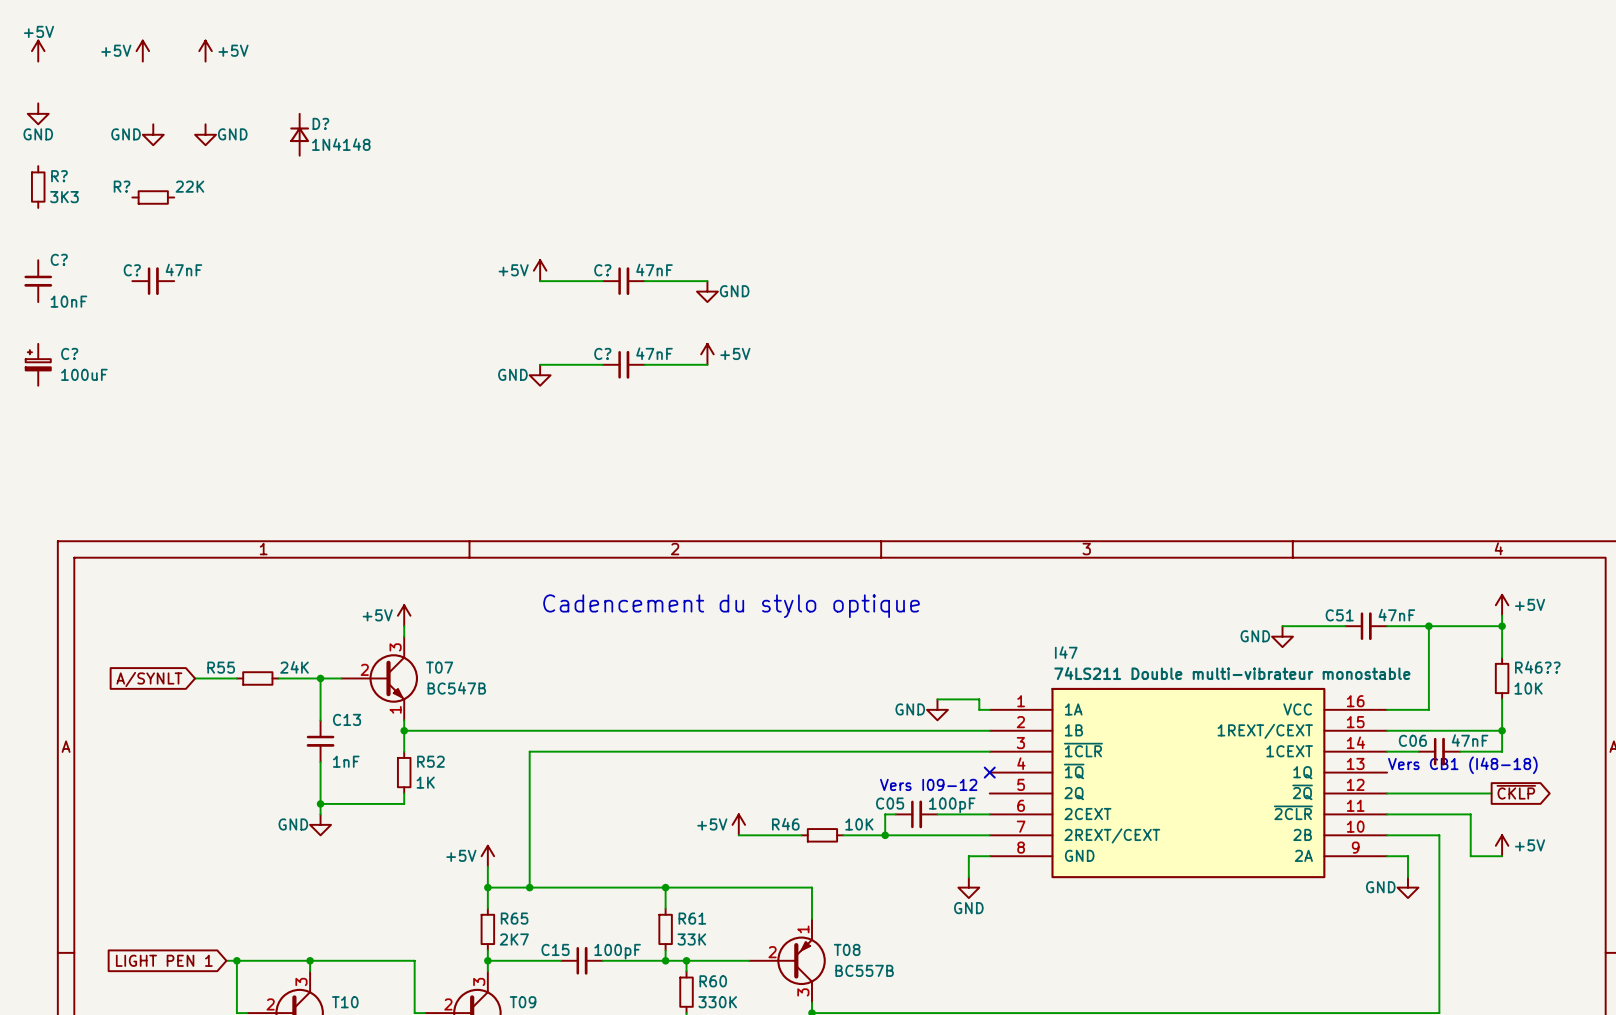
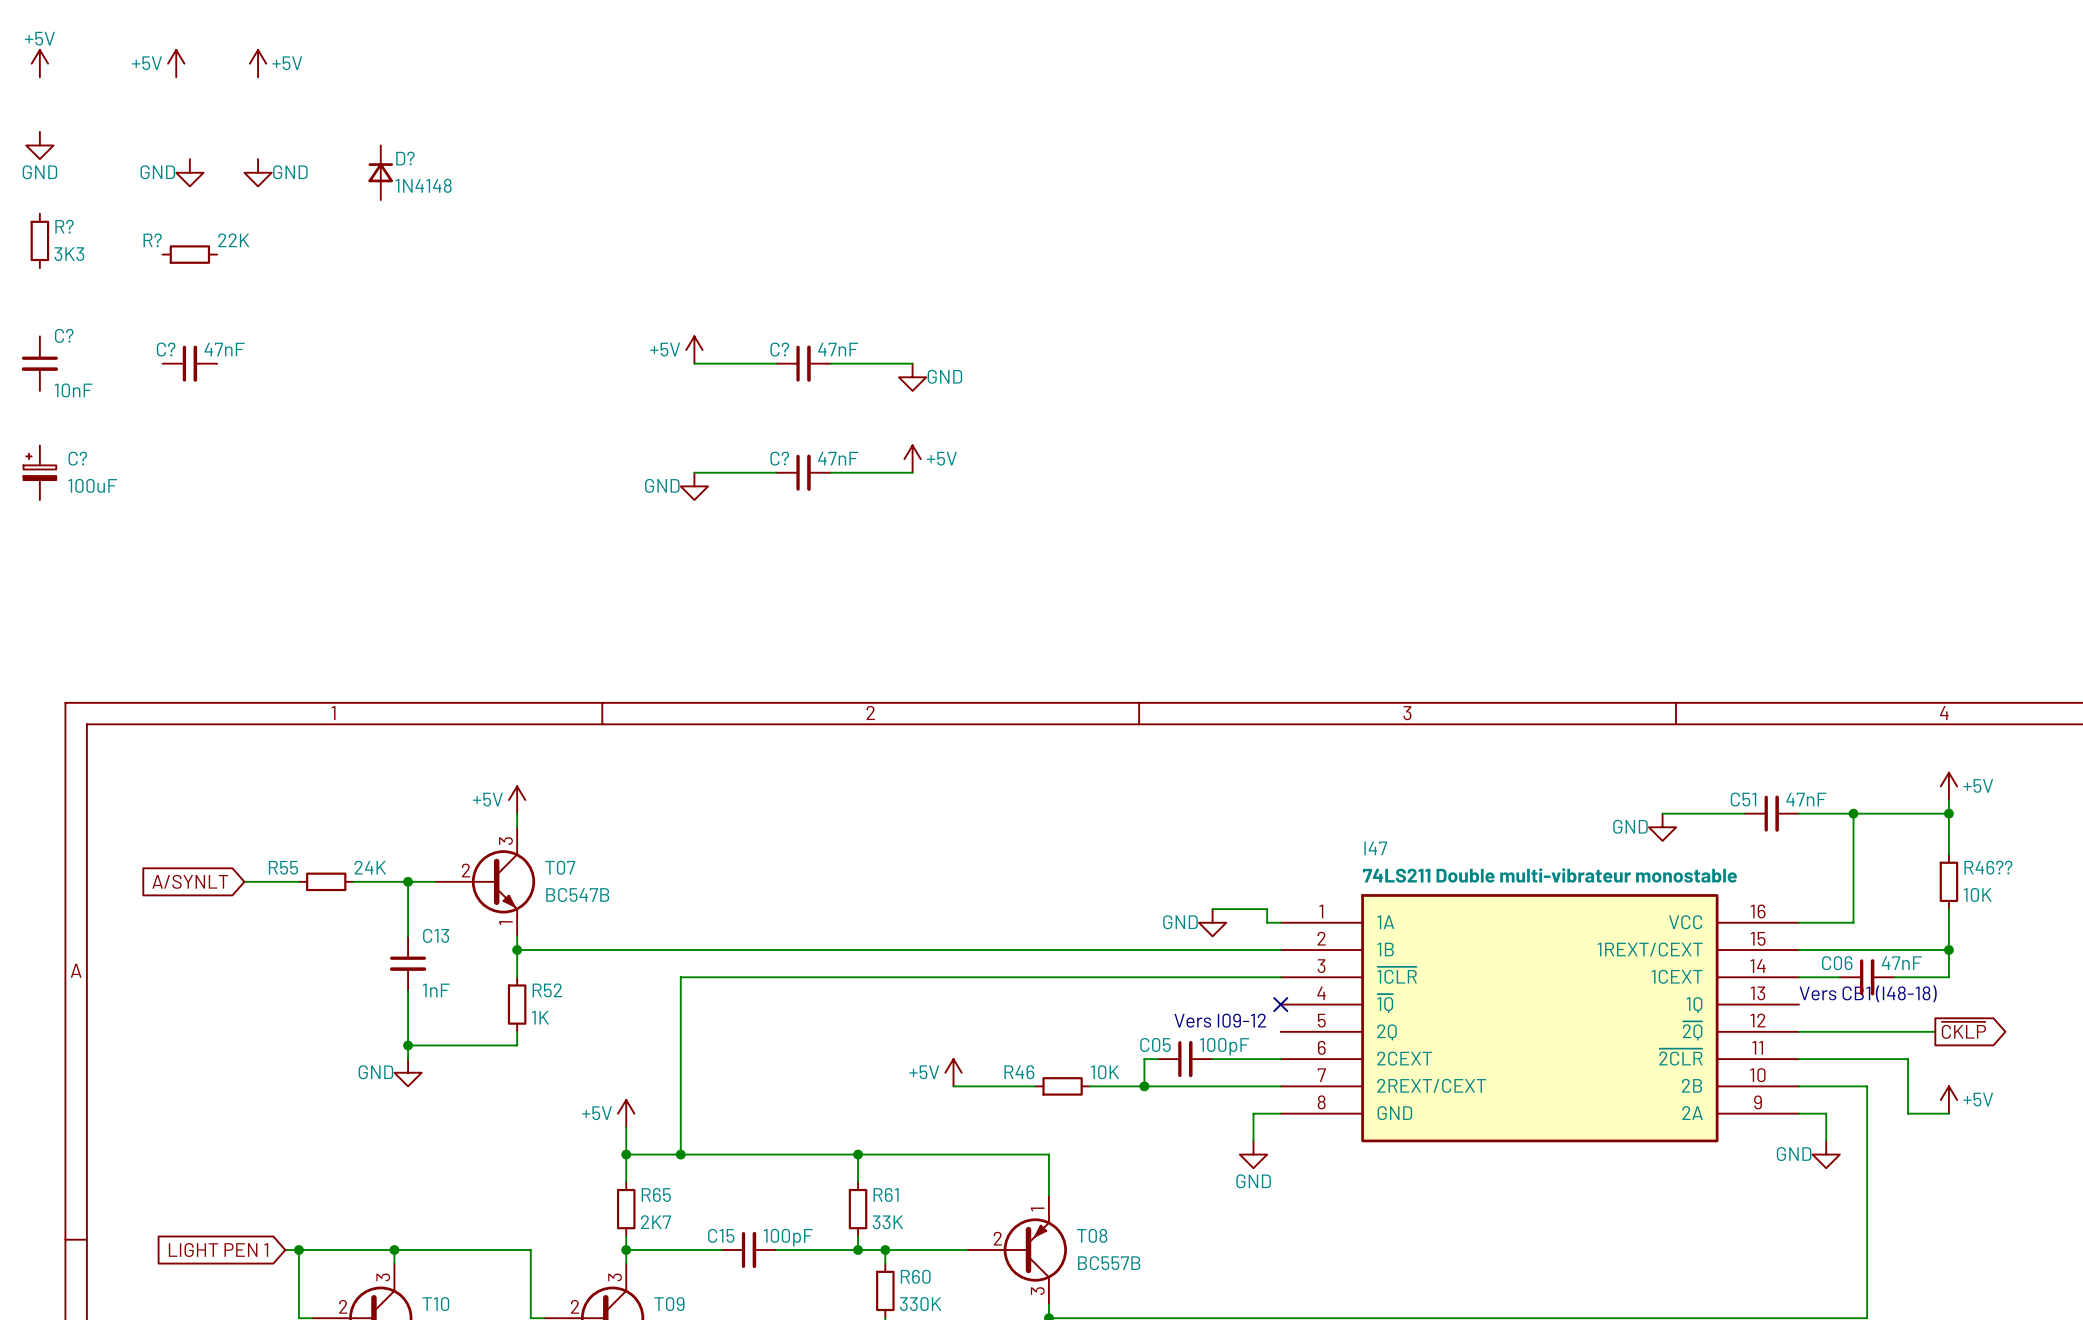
text: Cadencement du stylo optique (731, 606) -> none

